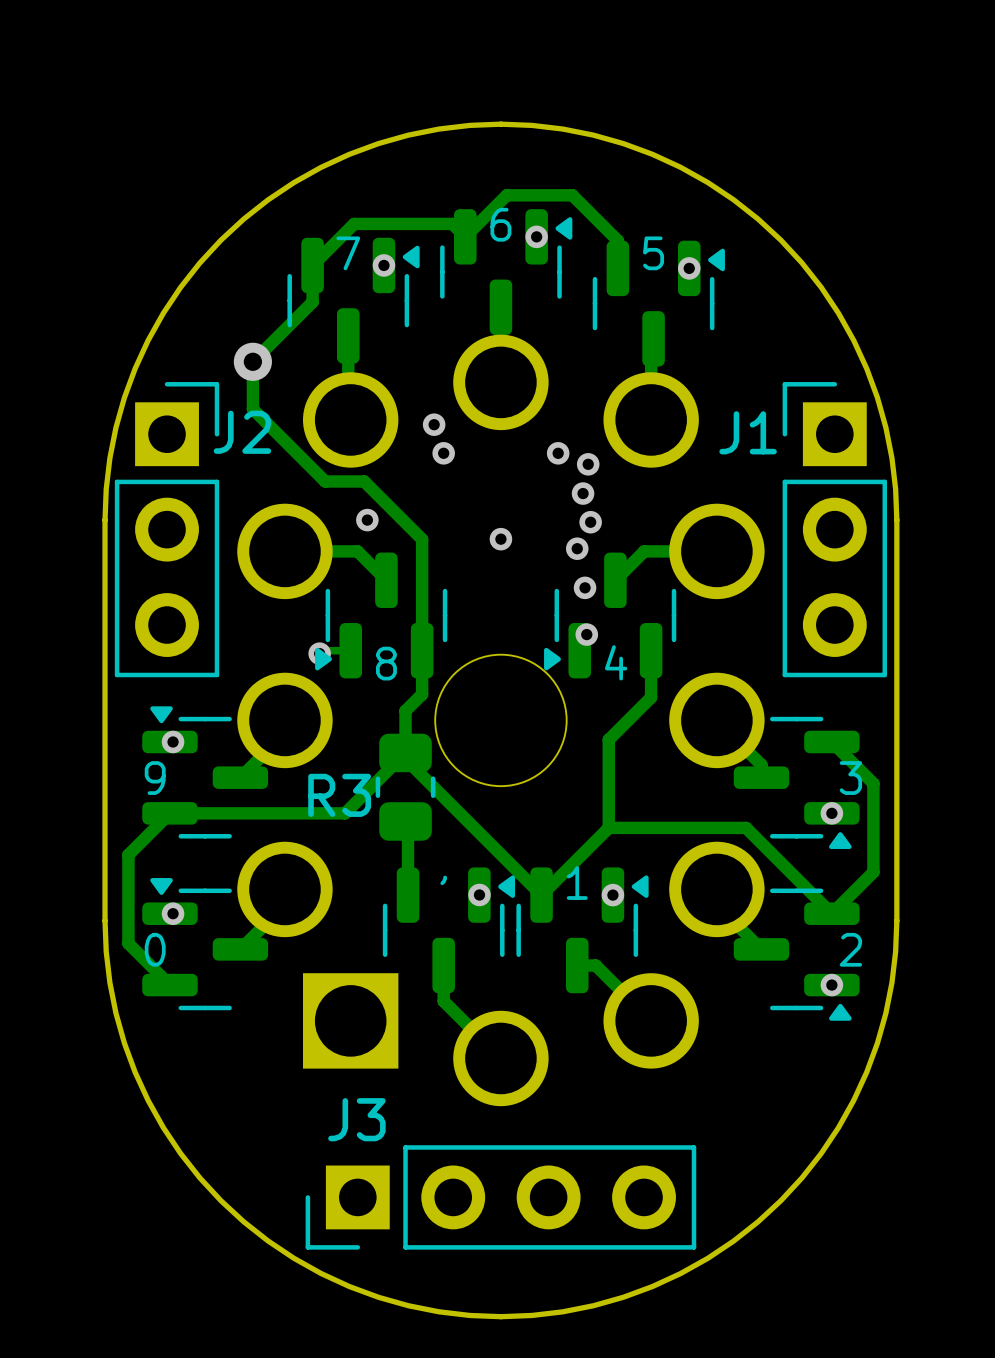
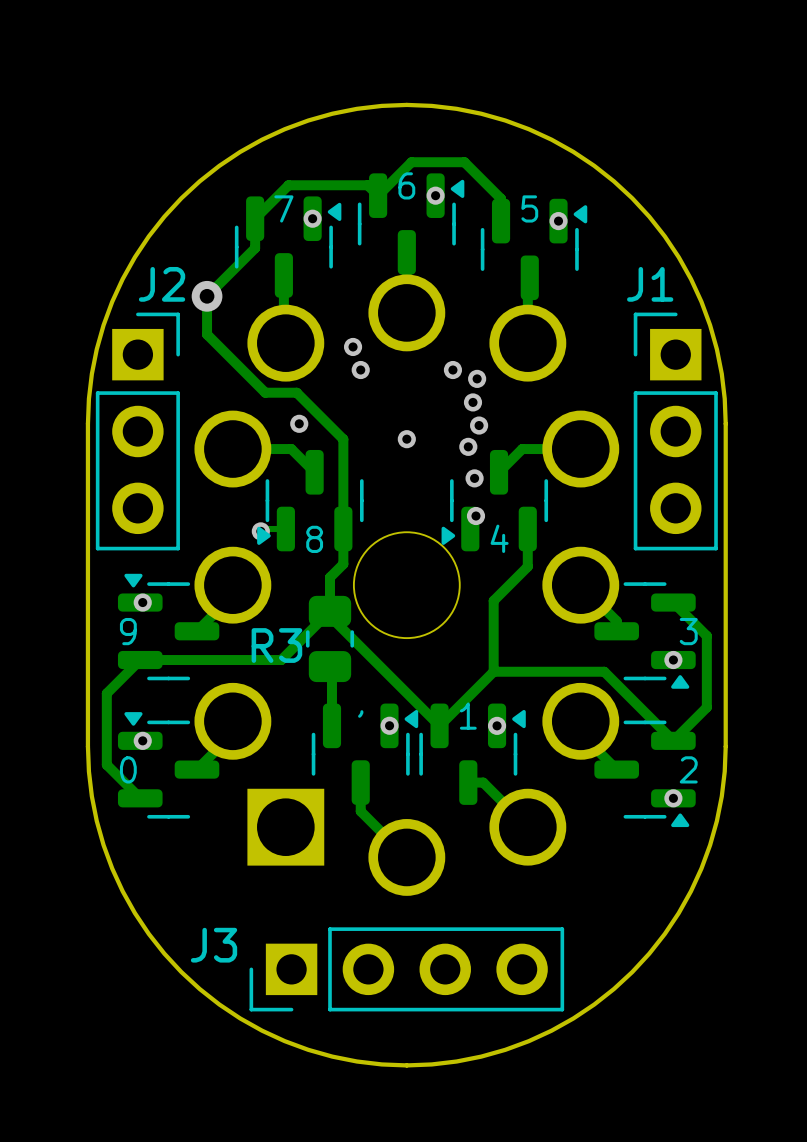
J2 name position: J2 (242, 432) -> J2 (162, 284)
J1 name position: J1 (748, 432) -> J1 (650, 284)
J3 name position: J3 (356, 1119) -> J3 (214, 945)

